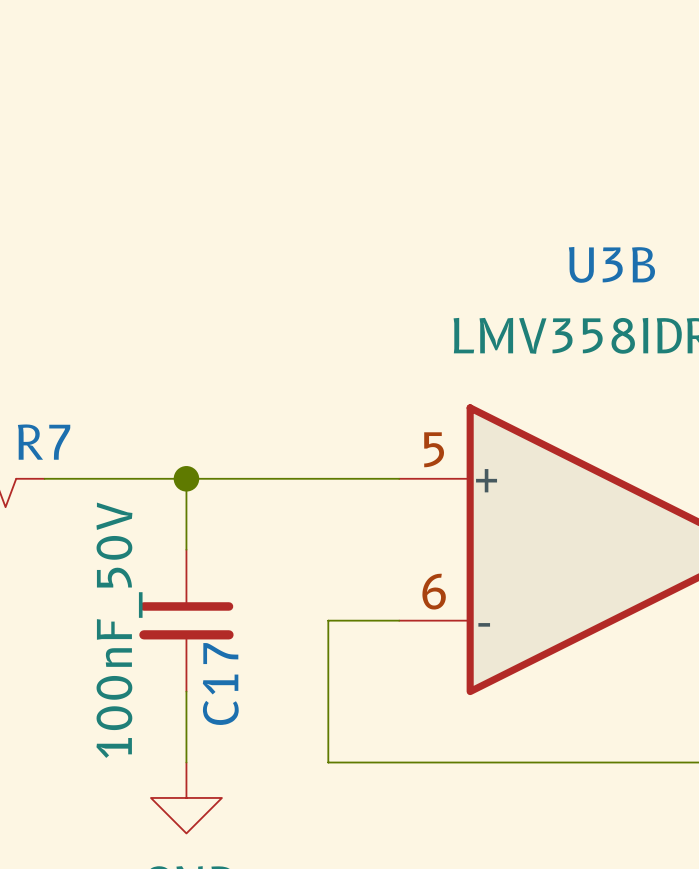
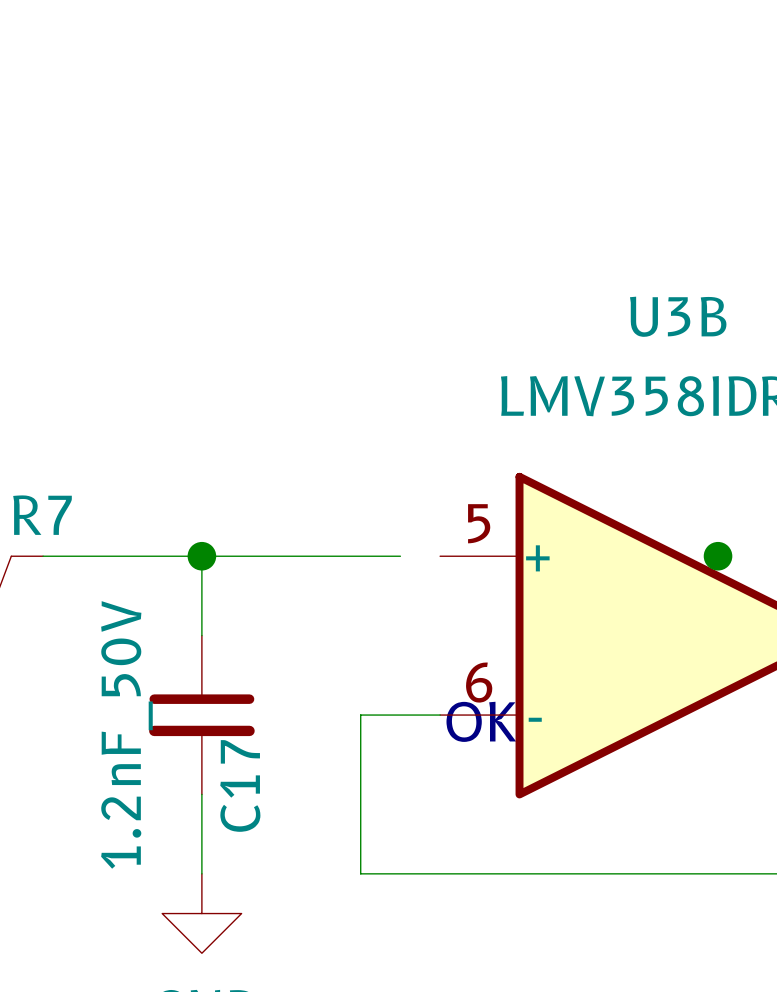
wire: (363, 478) (399, 478) -> none
junction: none -> (718, 556)
text: none -> OK (481, 721)
C17 value: 100nF_50V (119, 630) -> 1.2nF_50V (126, 734)

